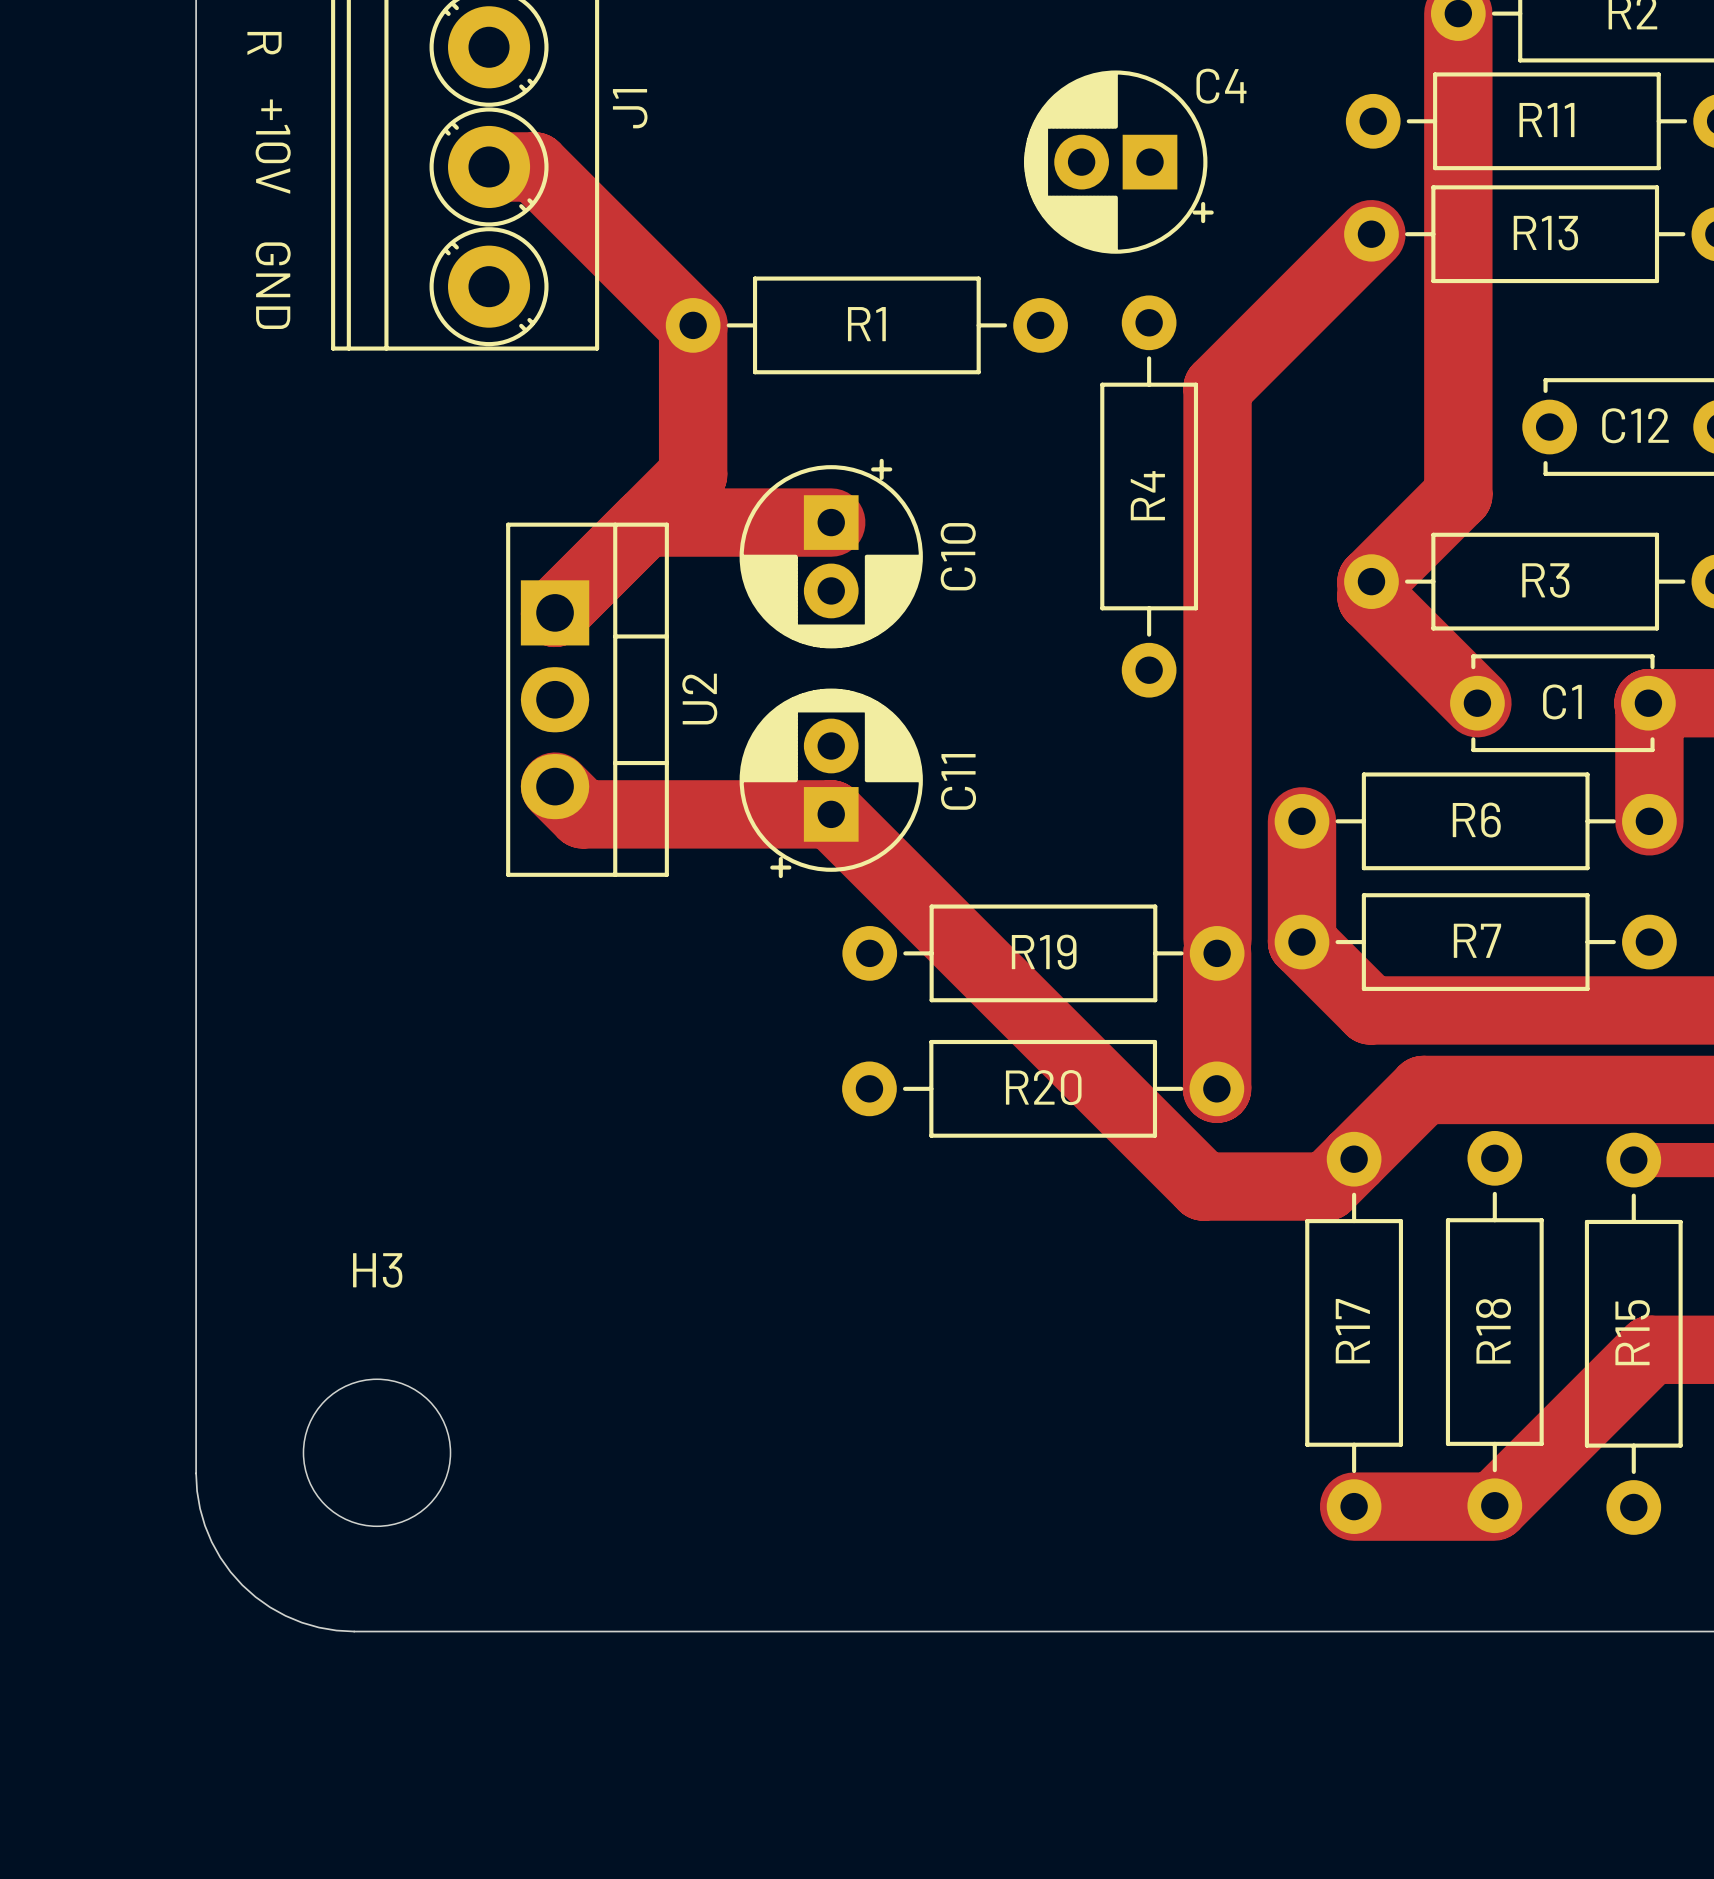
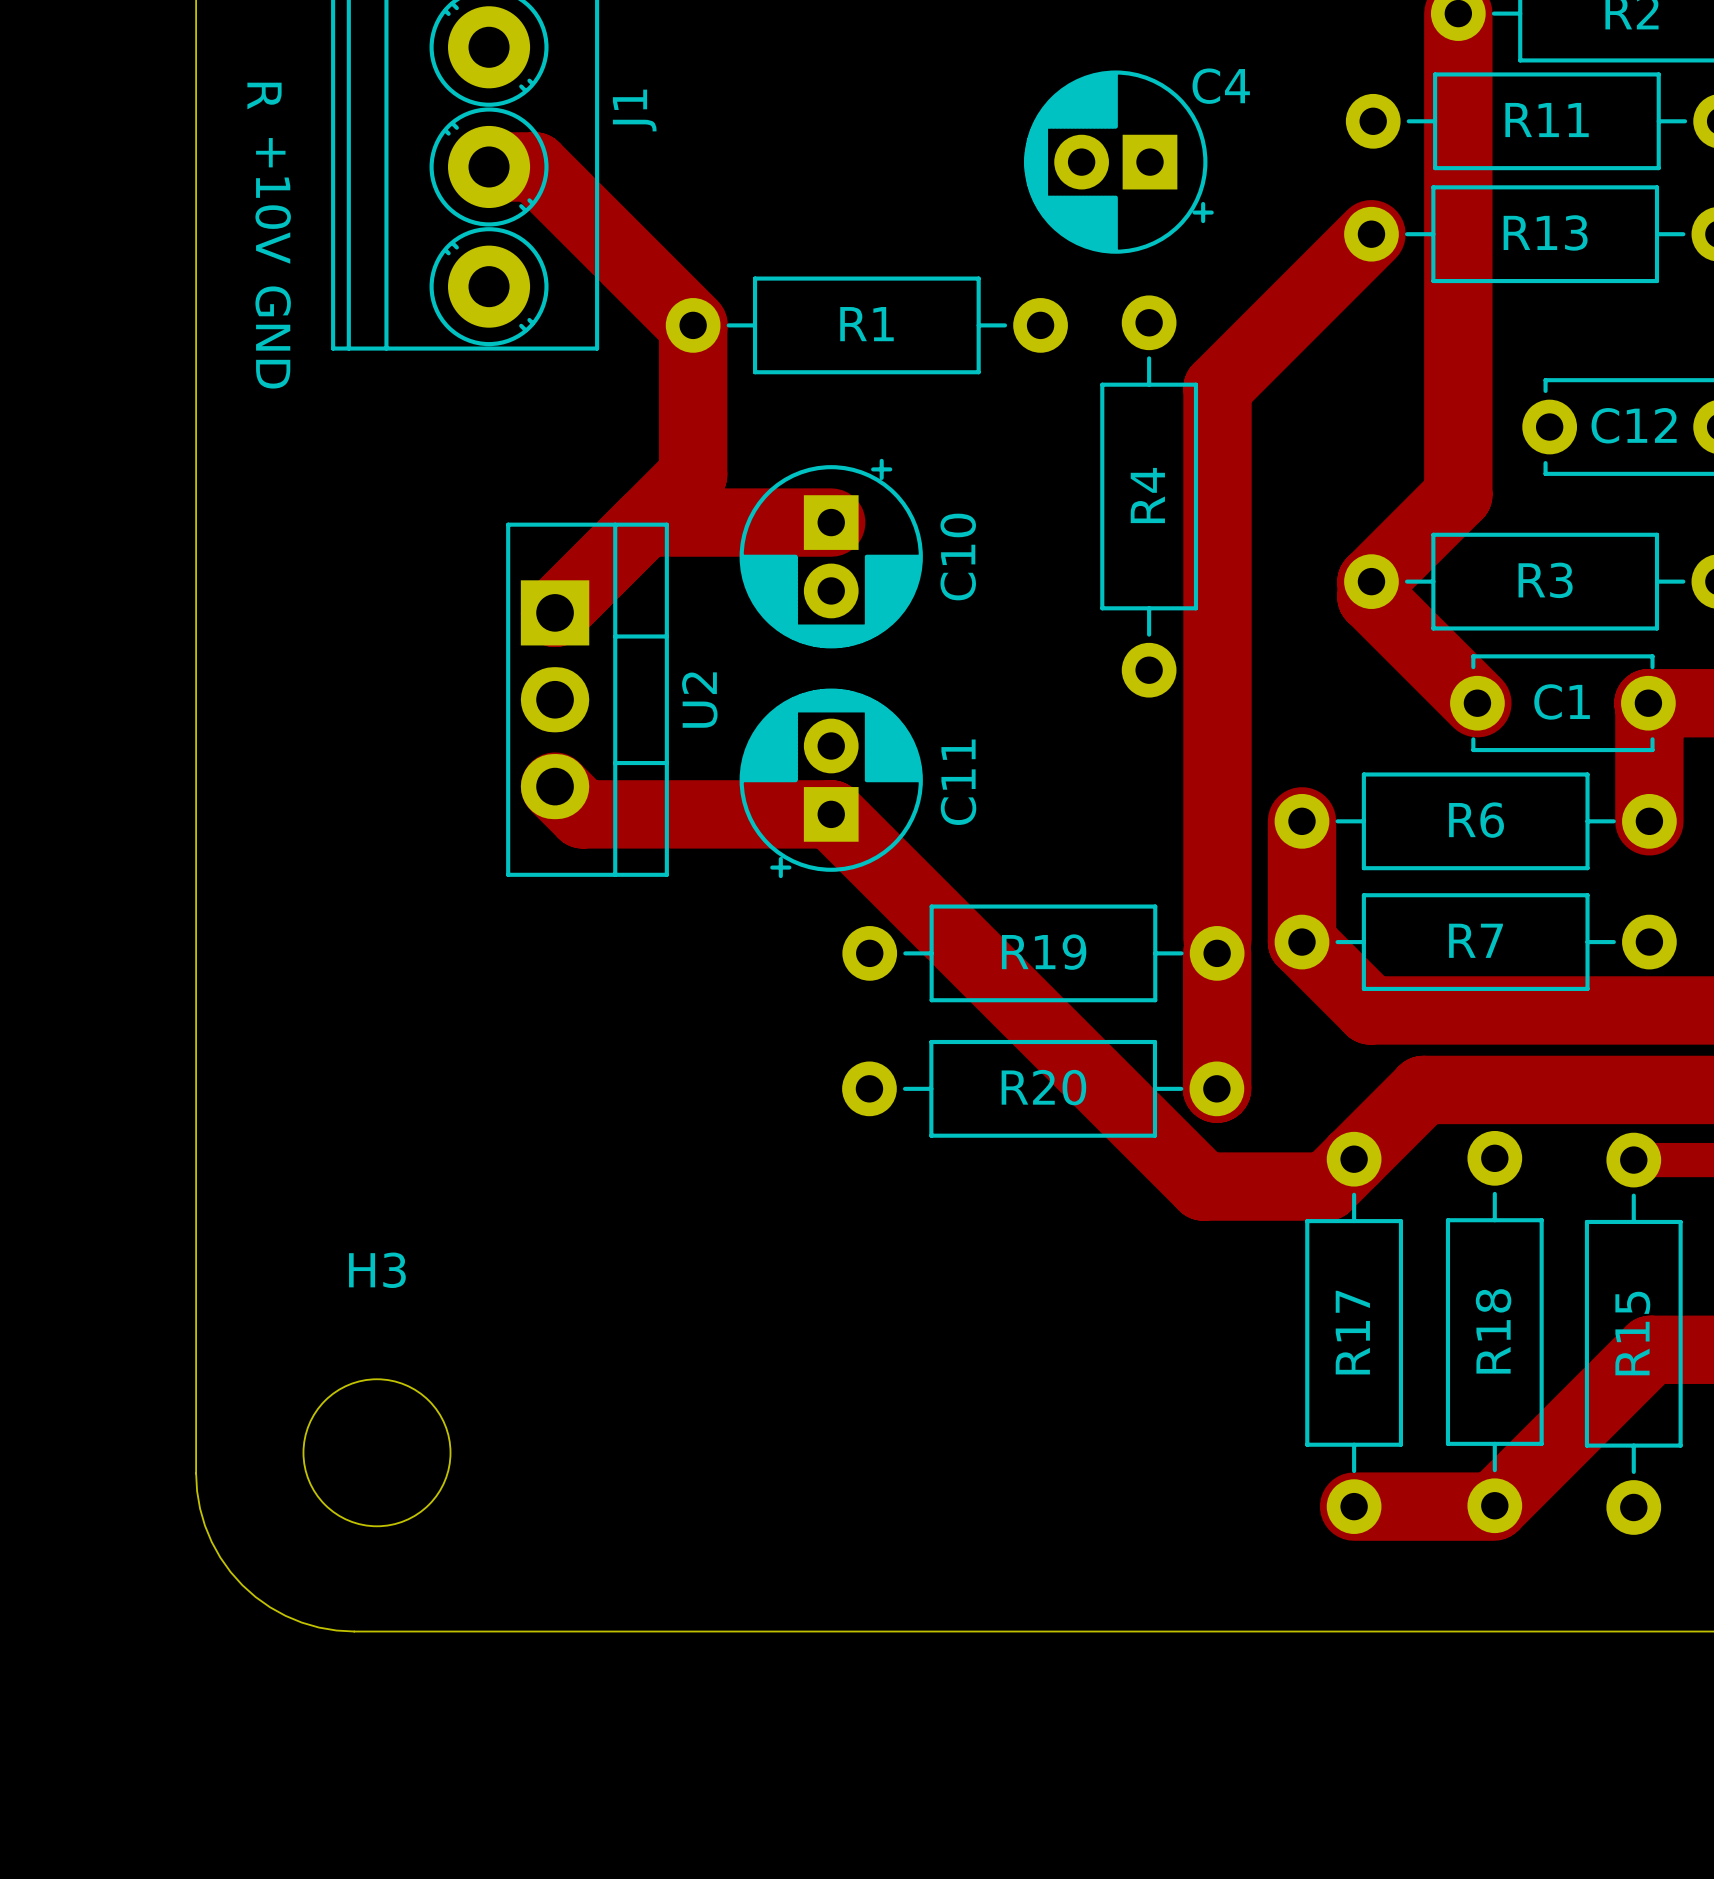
text position: R (264, 43) -> R (264, 95)
text position: +10V (273, 146) -> +10V (273, 200)
text position: GND (273, 285) -> GND (273, 337)

